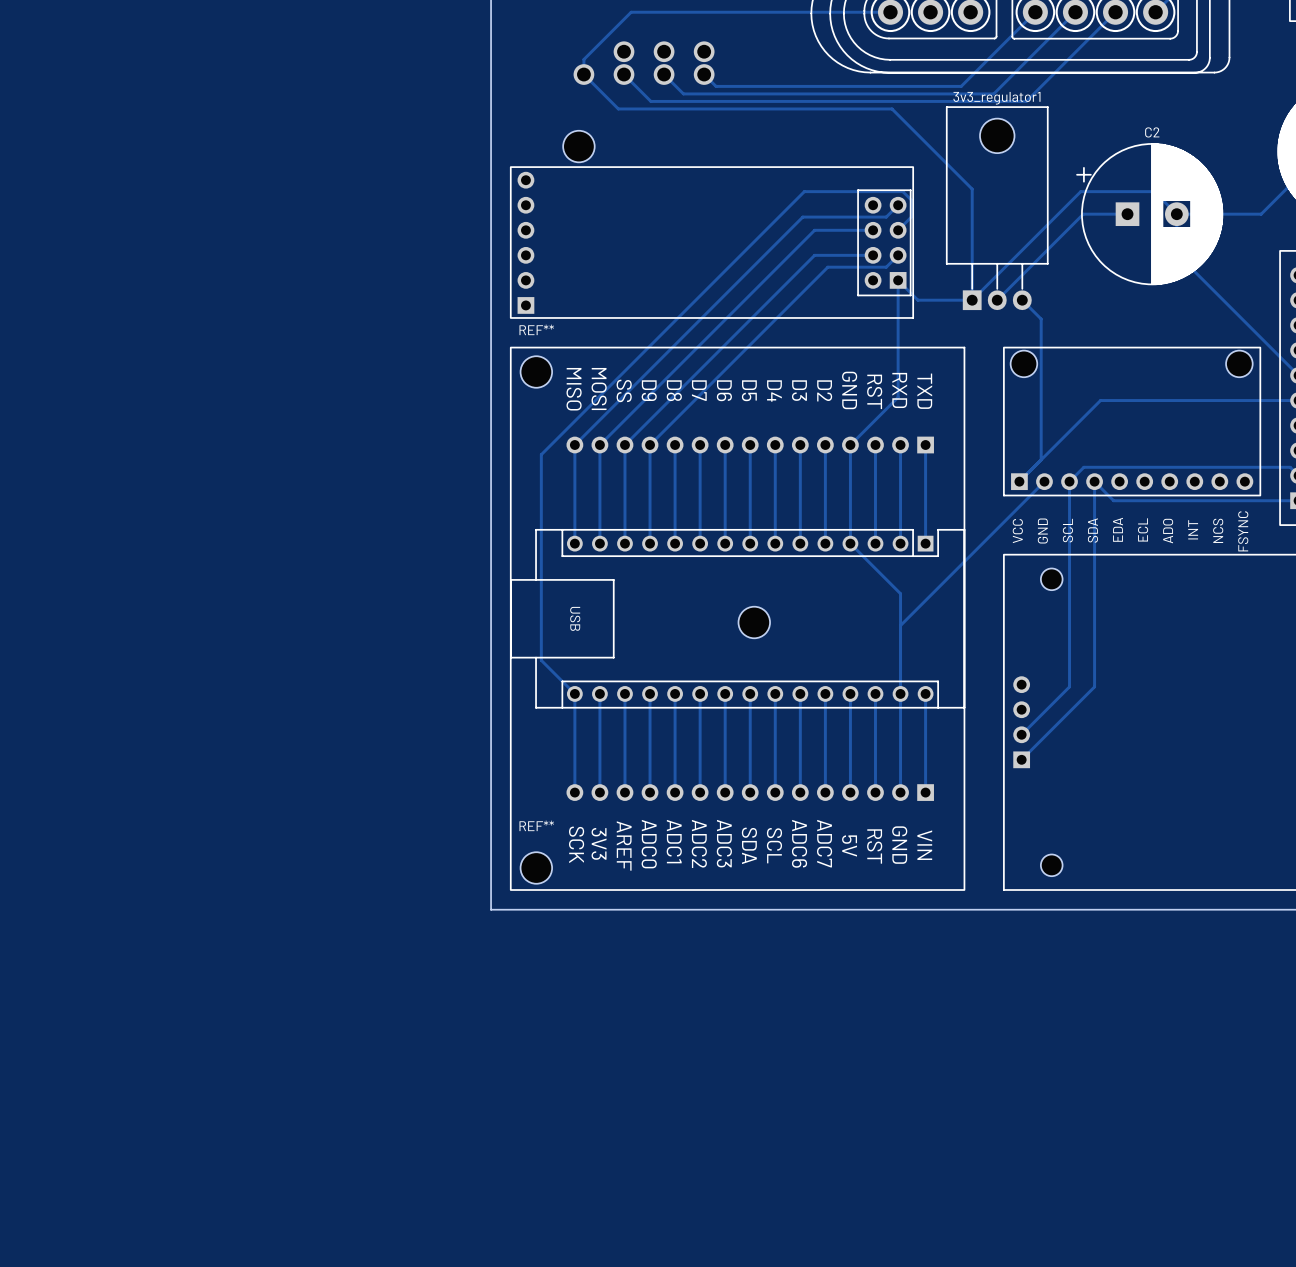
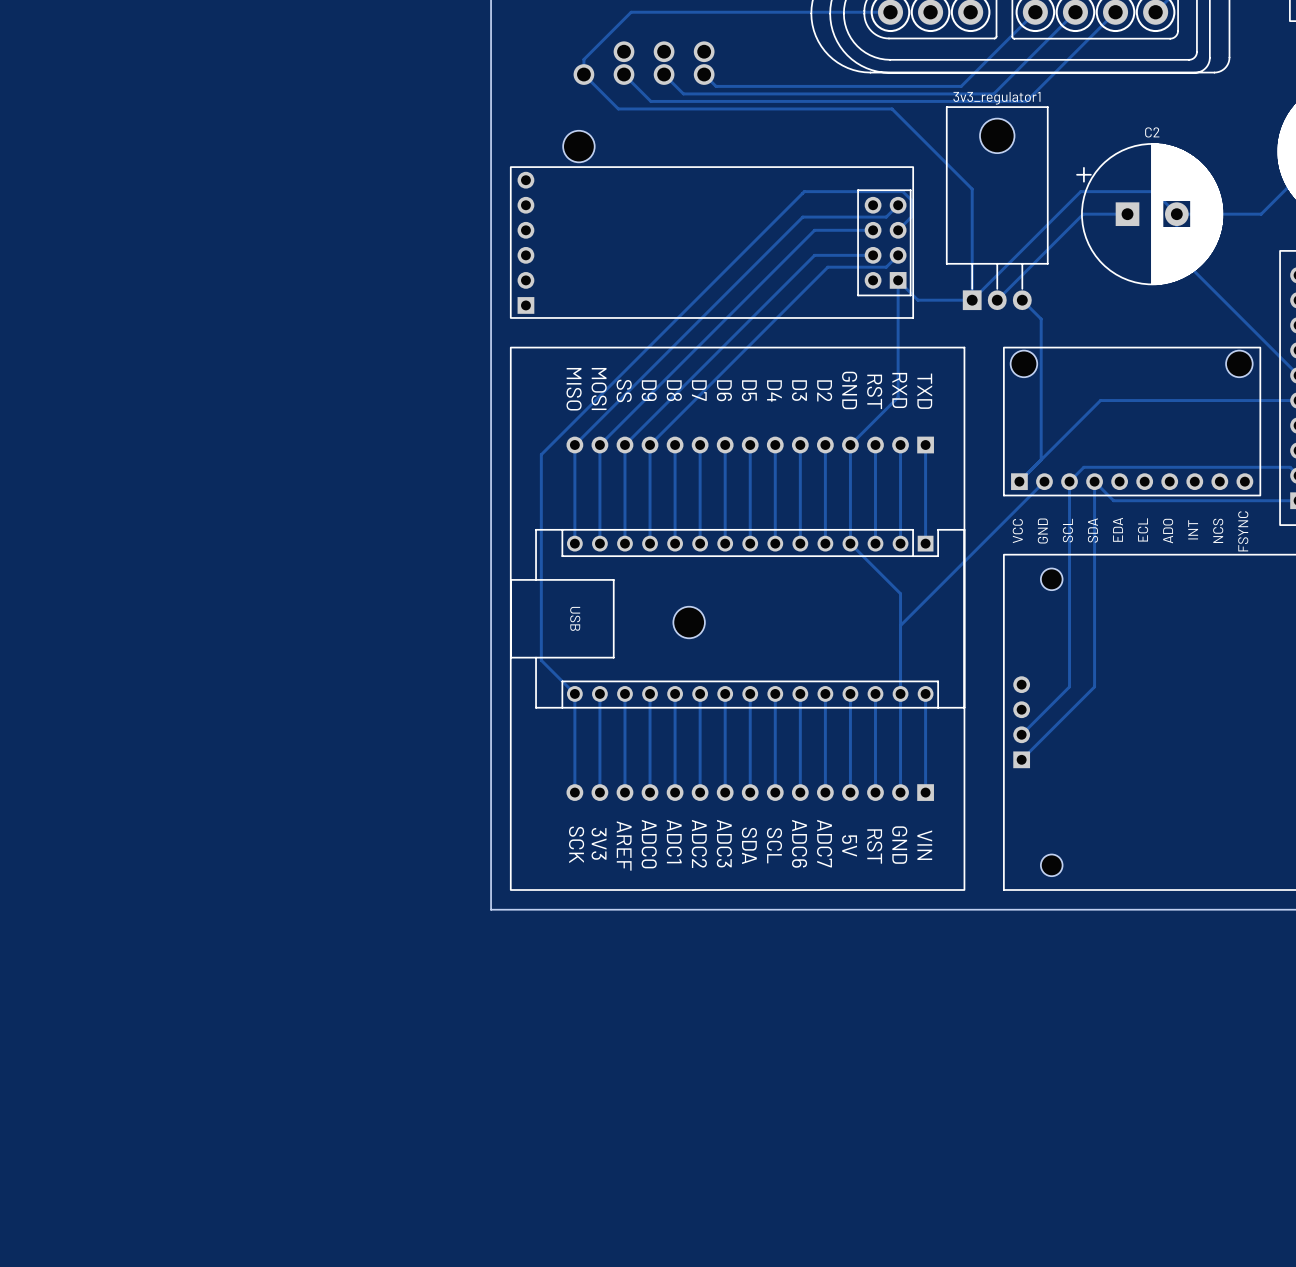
REF**: (536, 371) -> none
part position: (754, 622) -> (689, 622)
REF**: (536, 867) -> none

